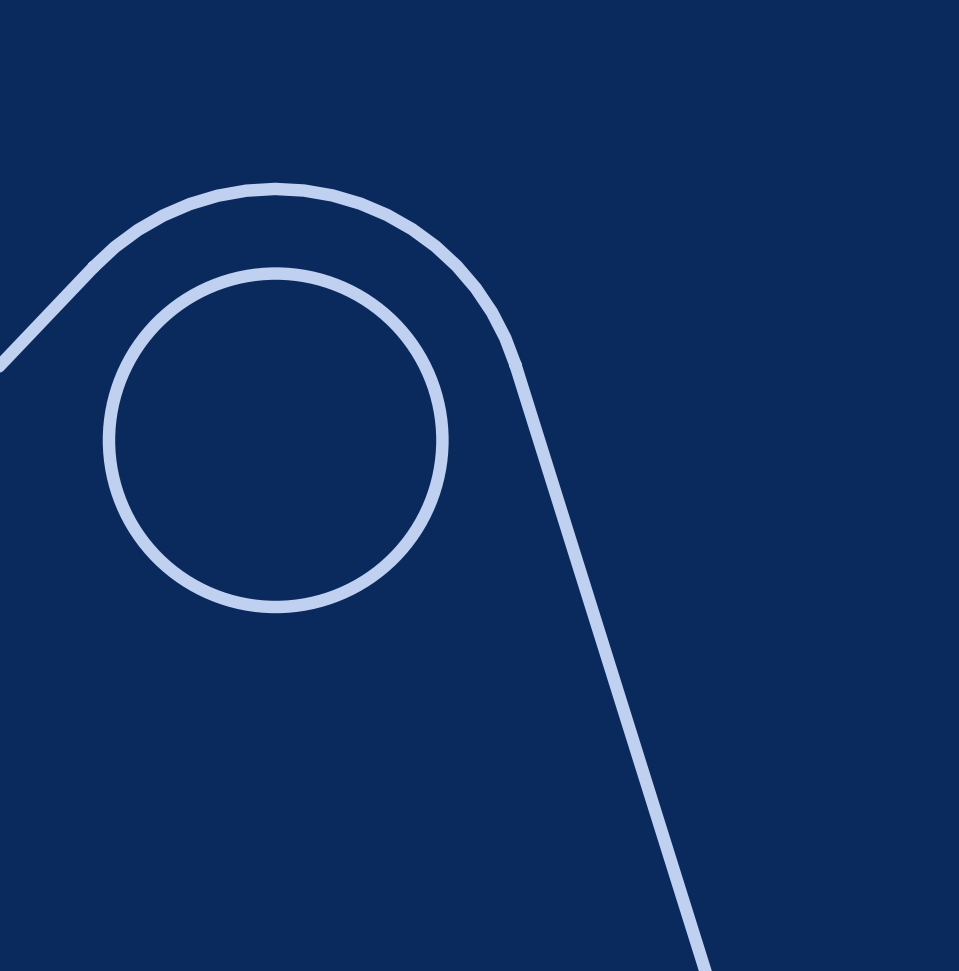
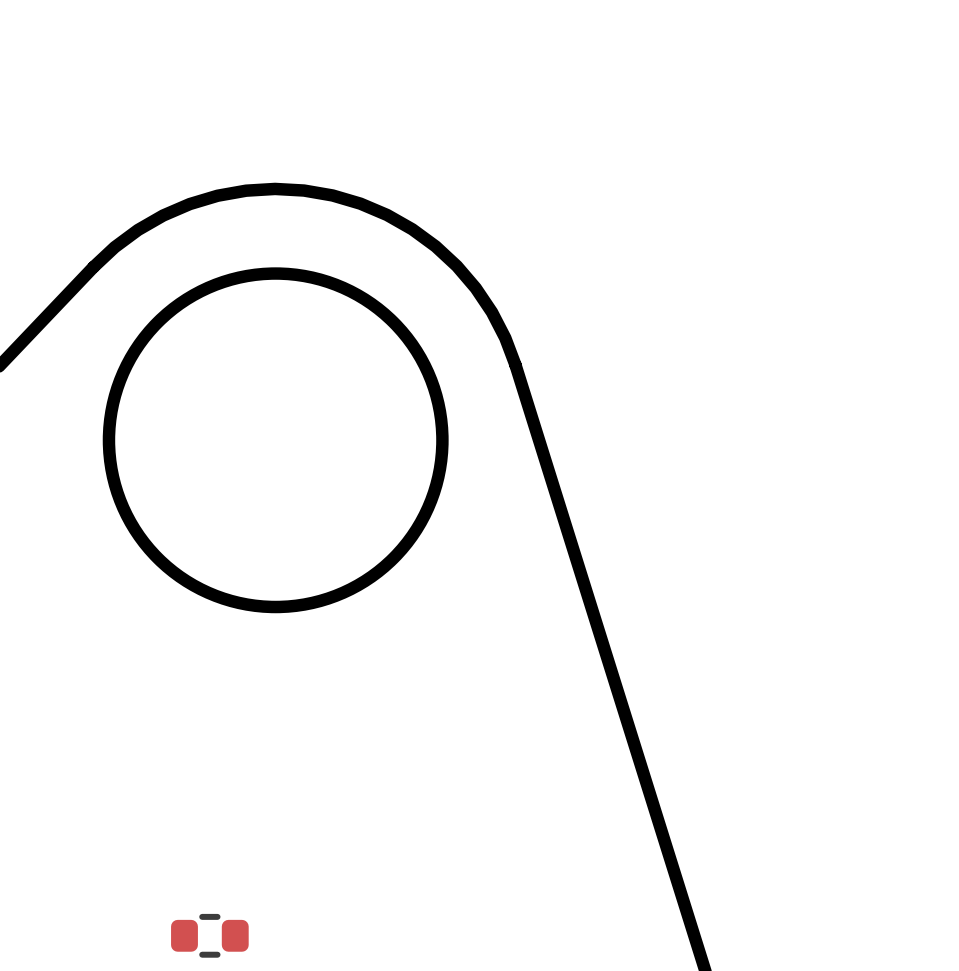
part: none -> (209, 935)

